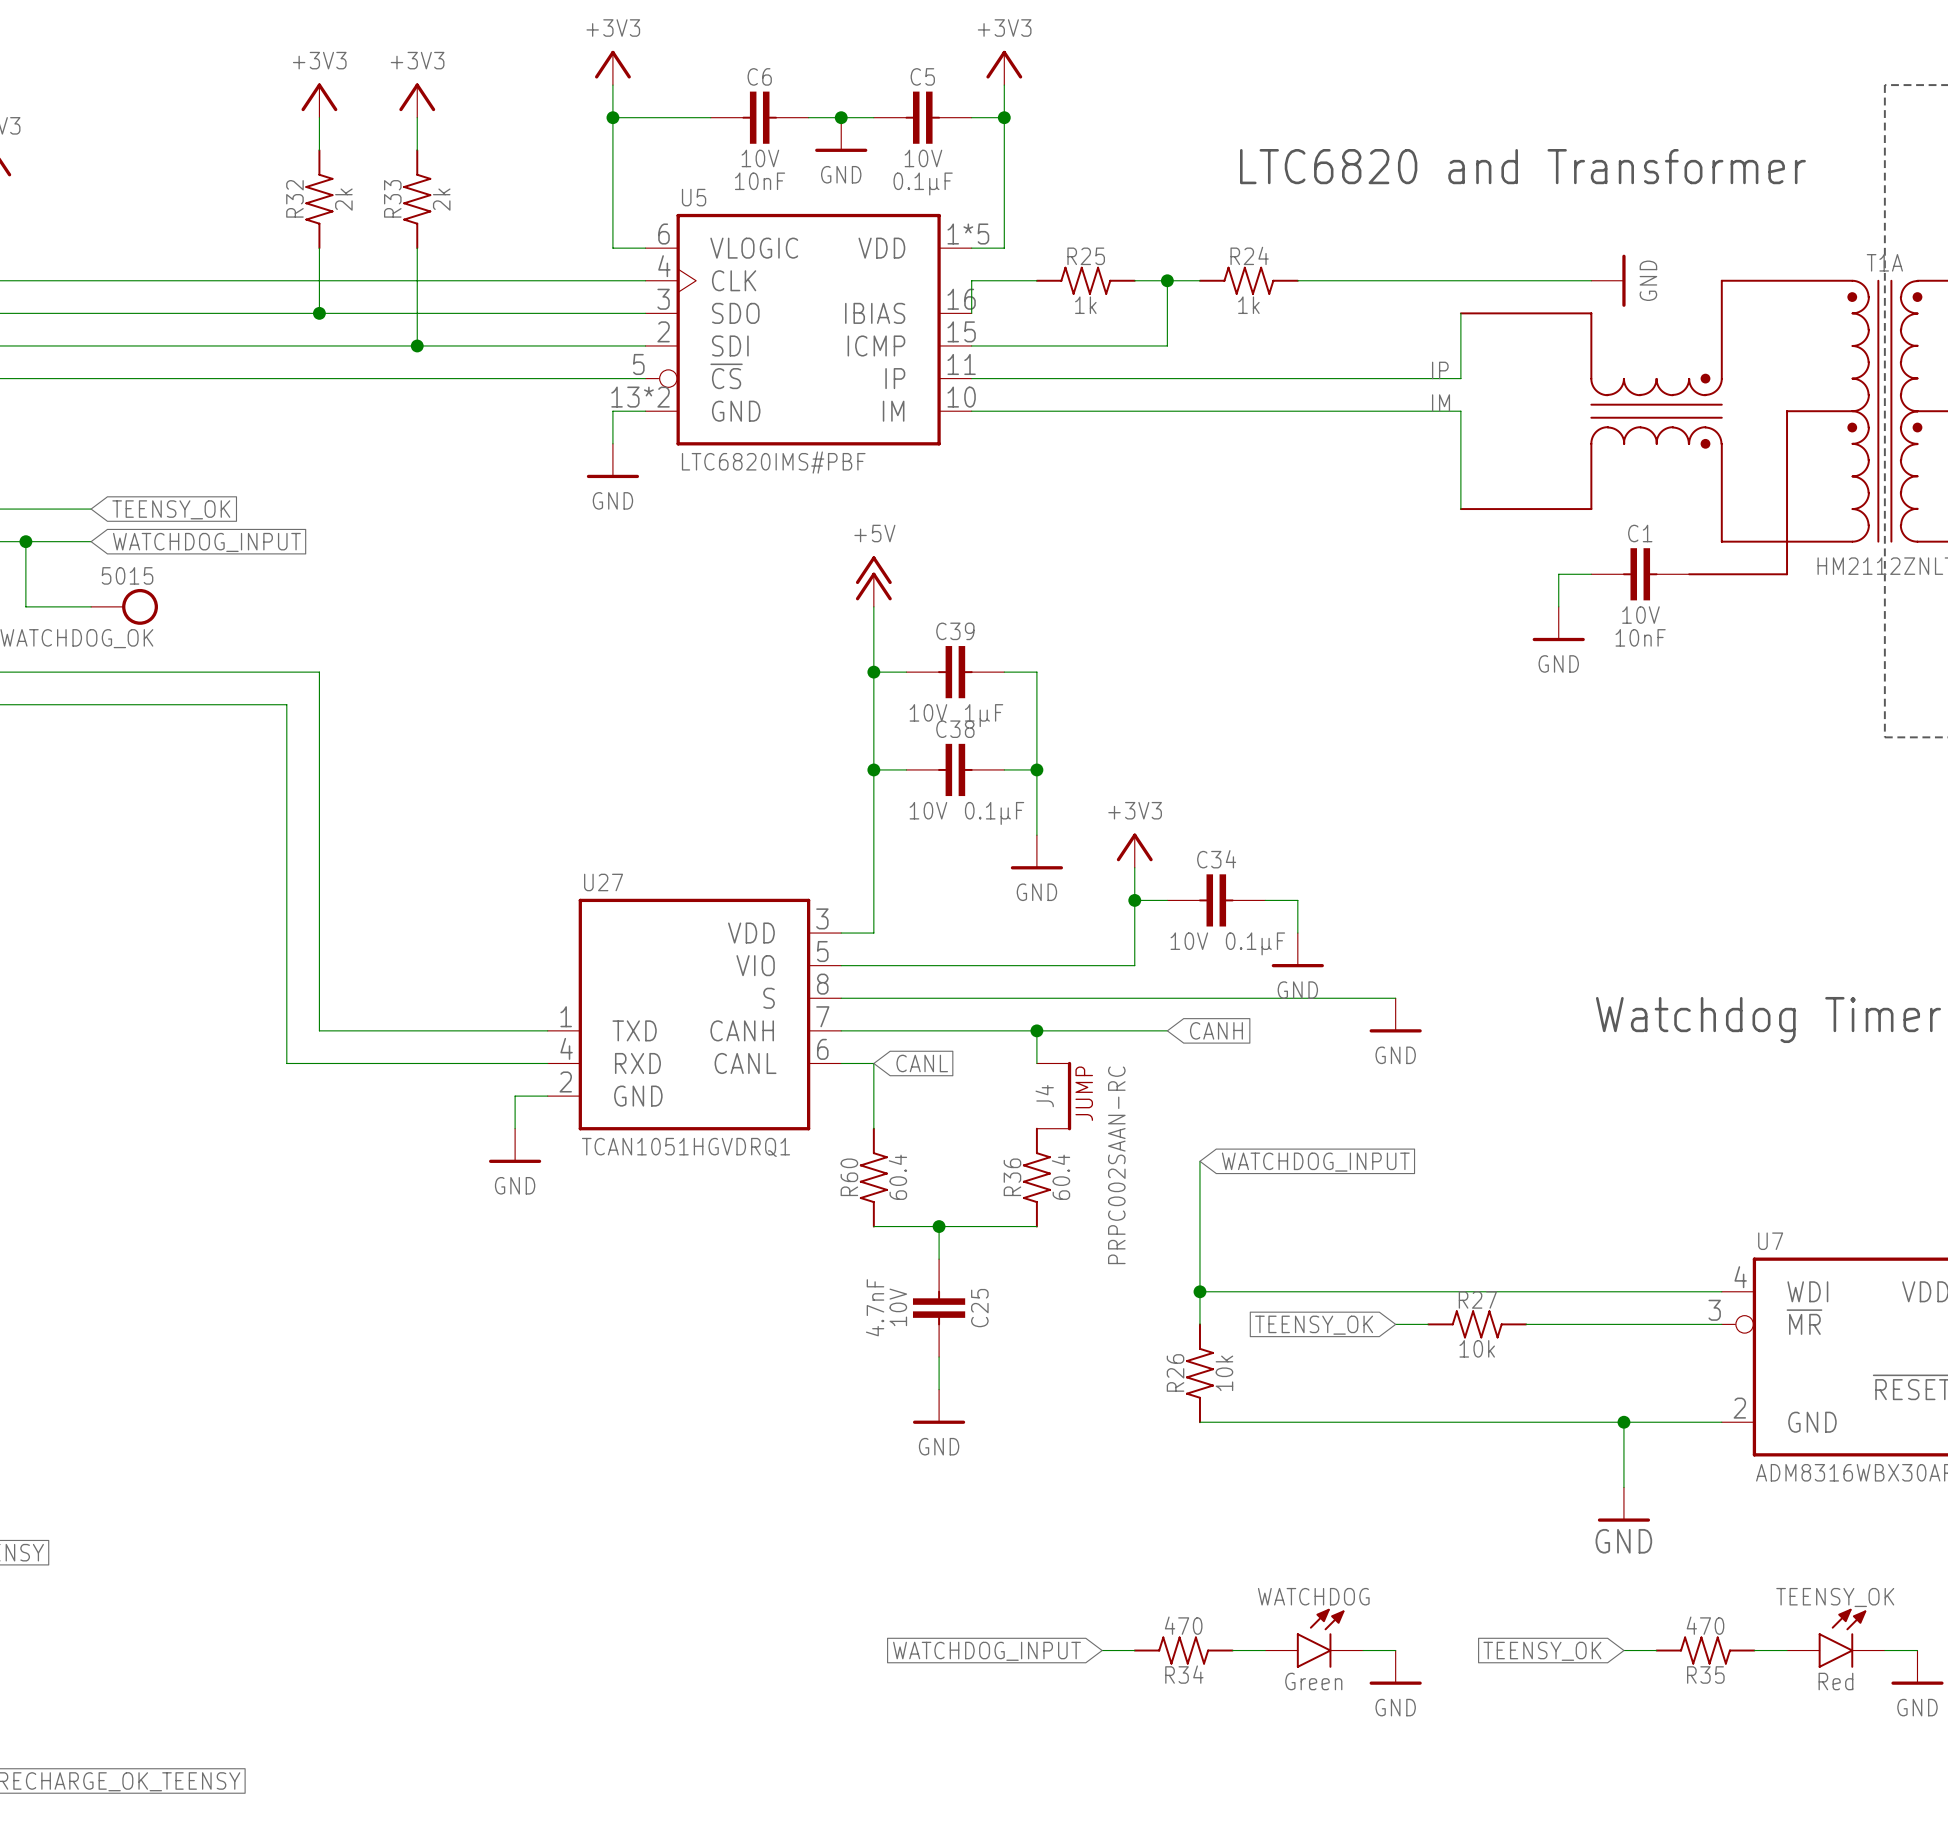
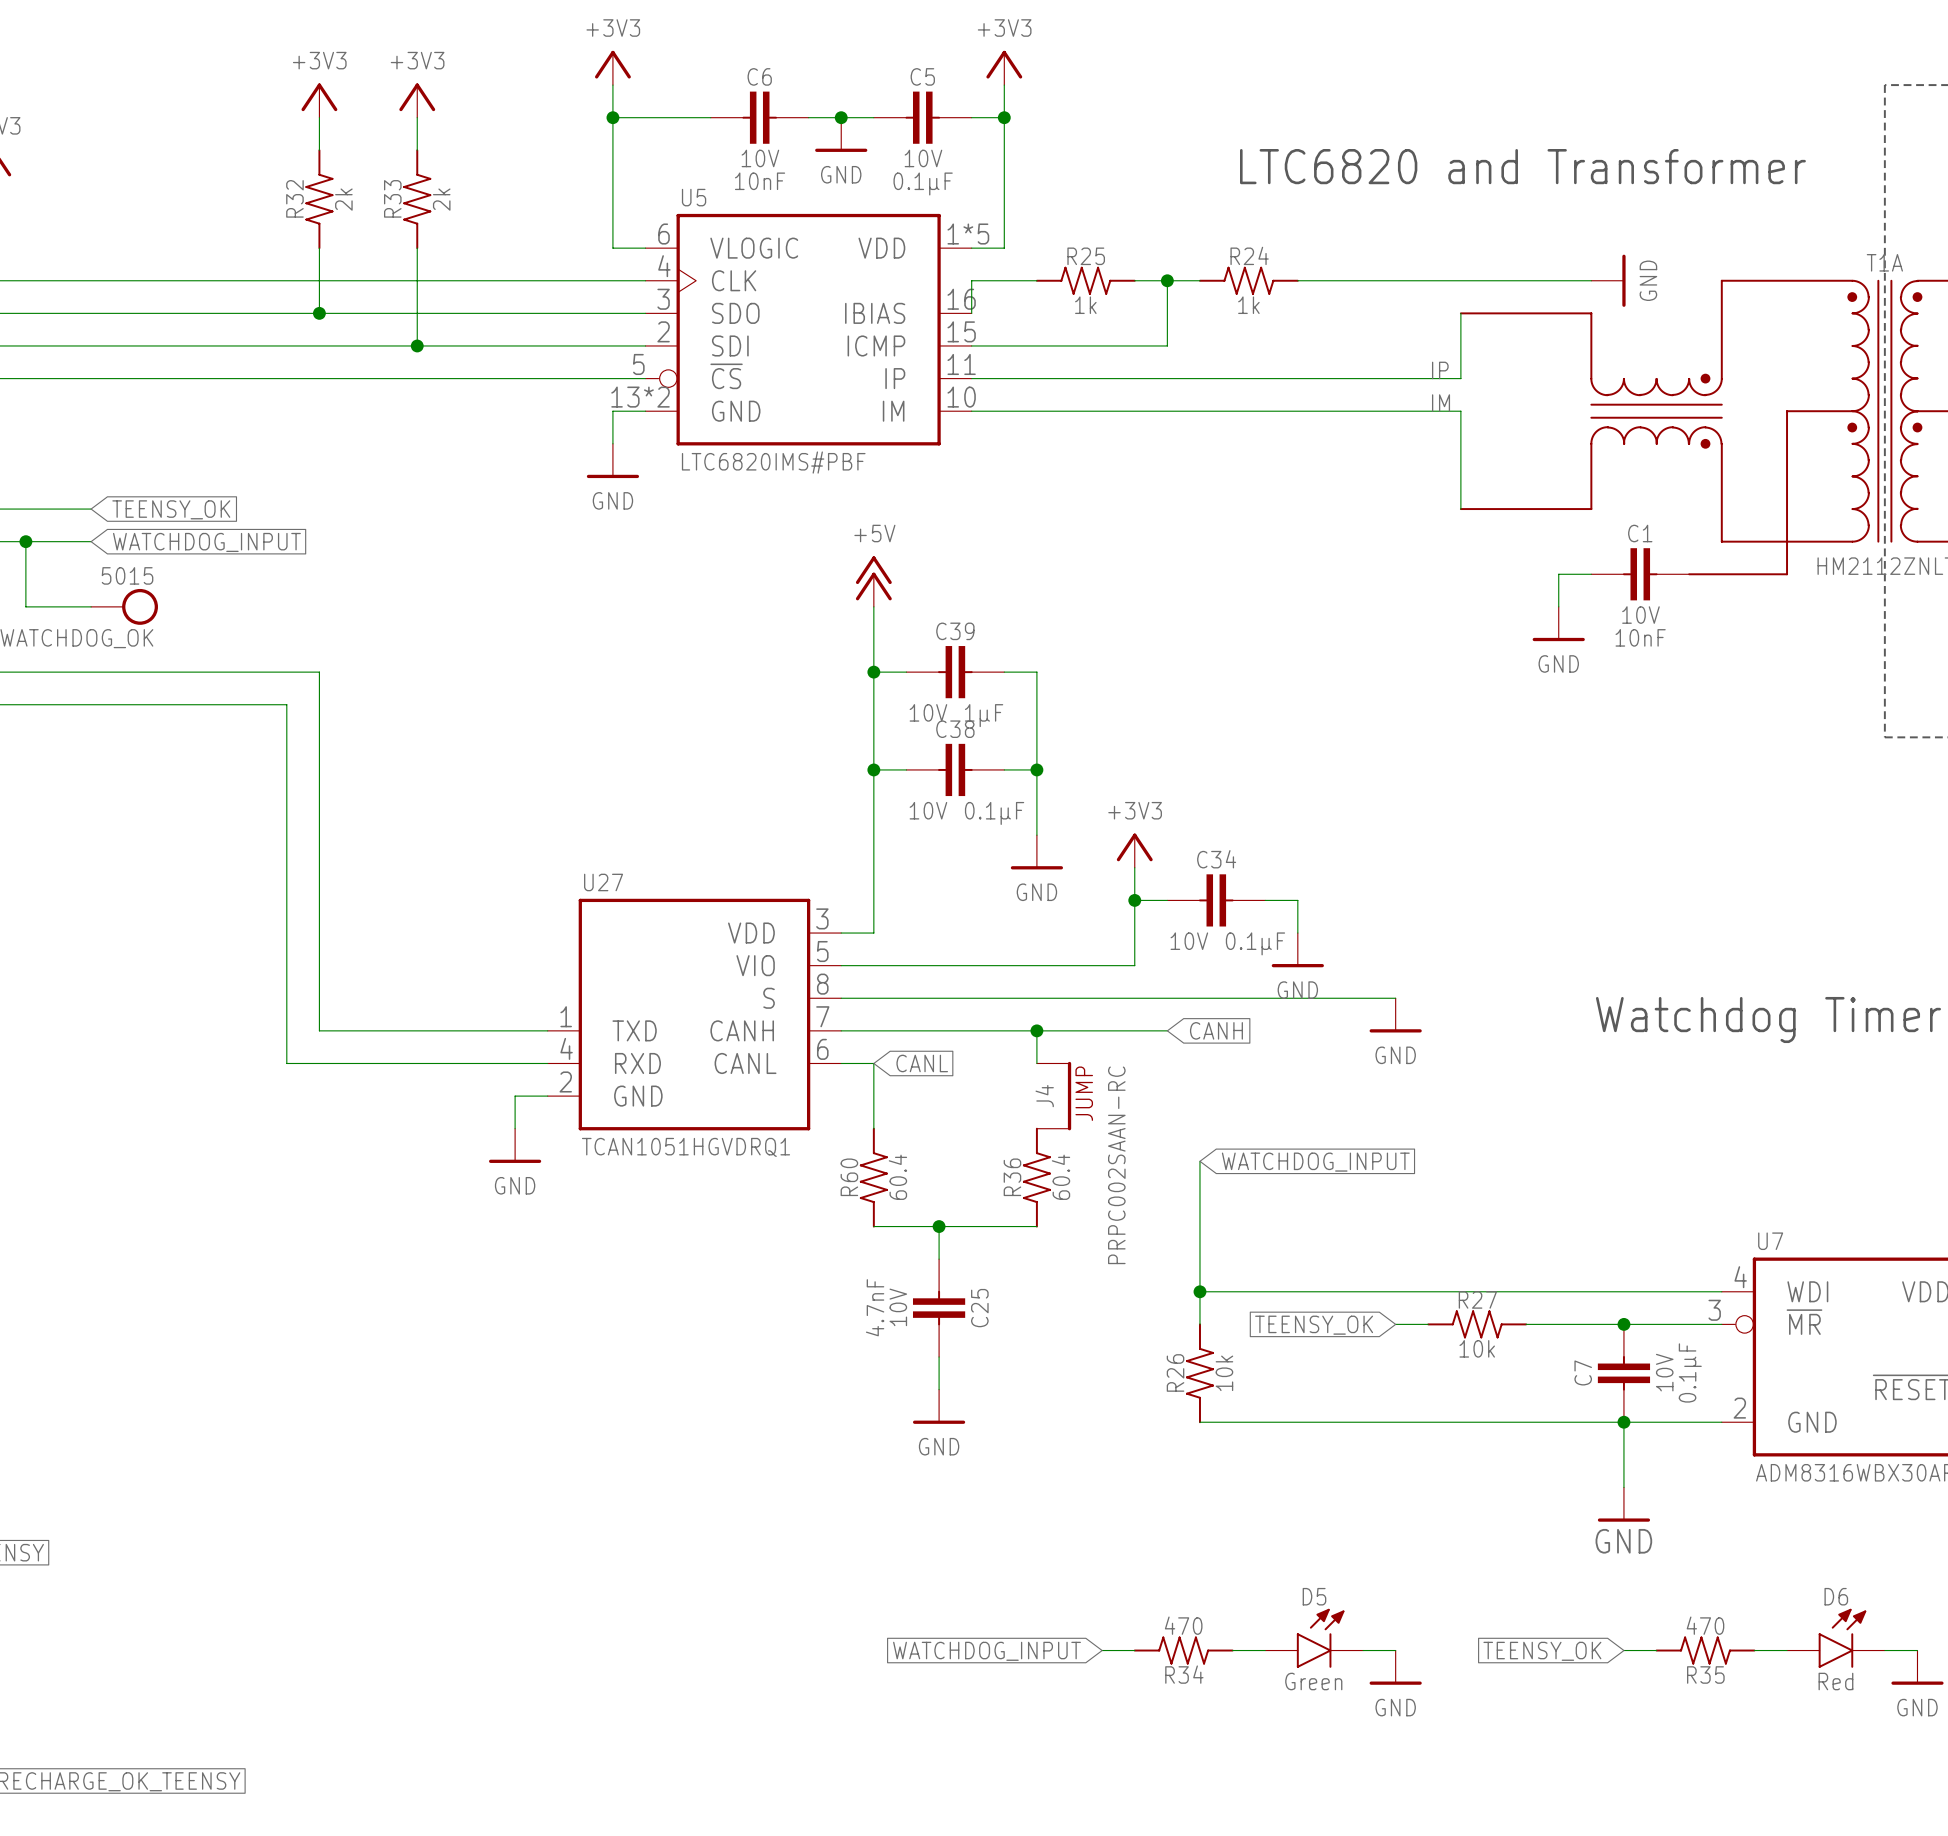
junction: none -> (1623, 1324)
C7: none -> (1623, 1373)
WATCHDOG name: WATCHDOG (1313, 1596) -> D5 (1314, 1596)
TEENSY_OK name: TEENSY_OK (1835, 1597) -> D6 (1836, 1596)

